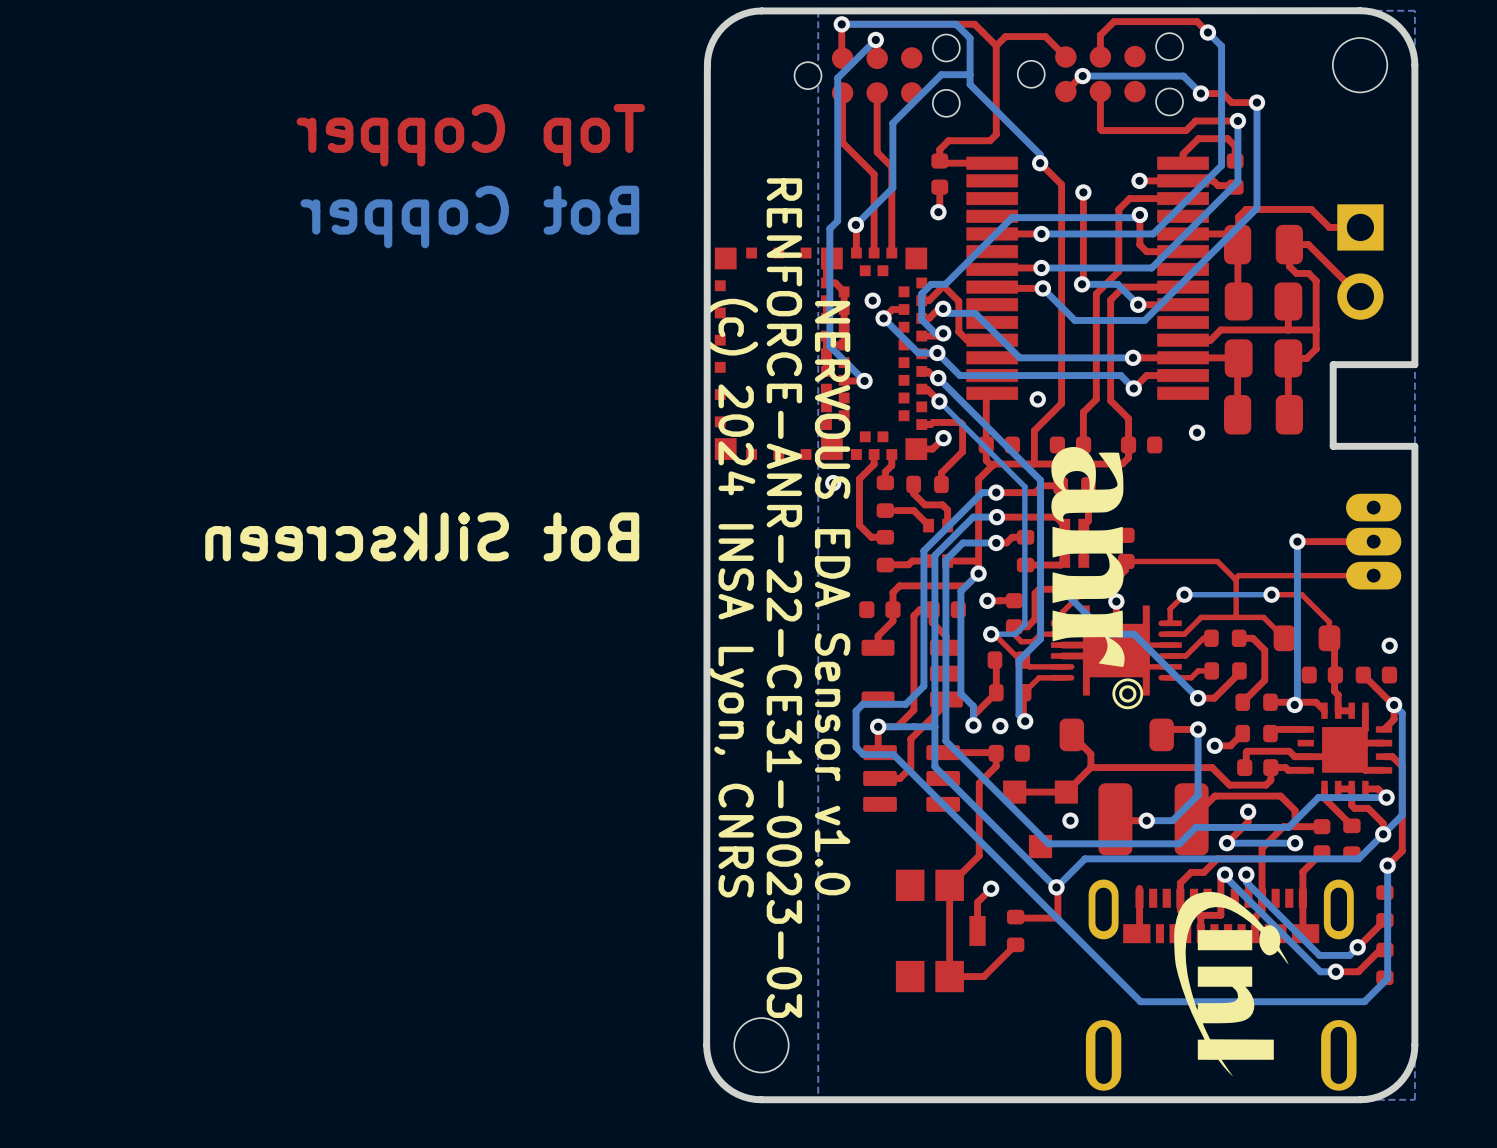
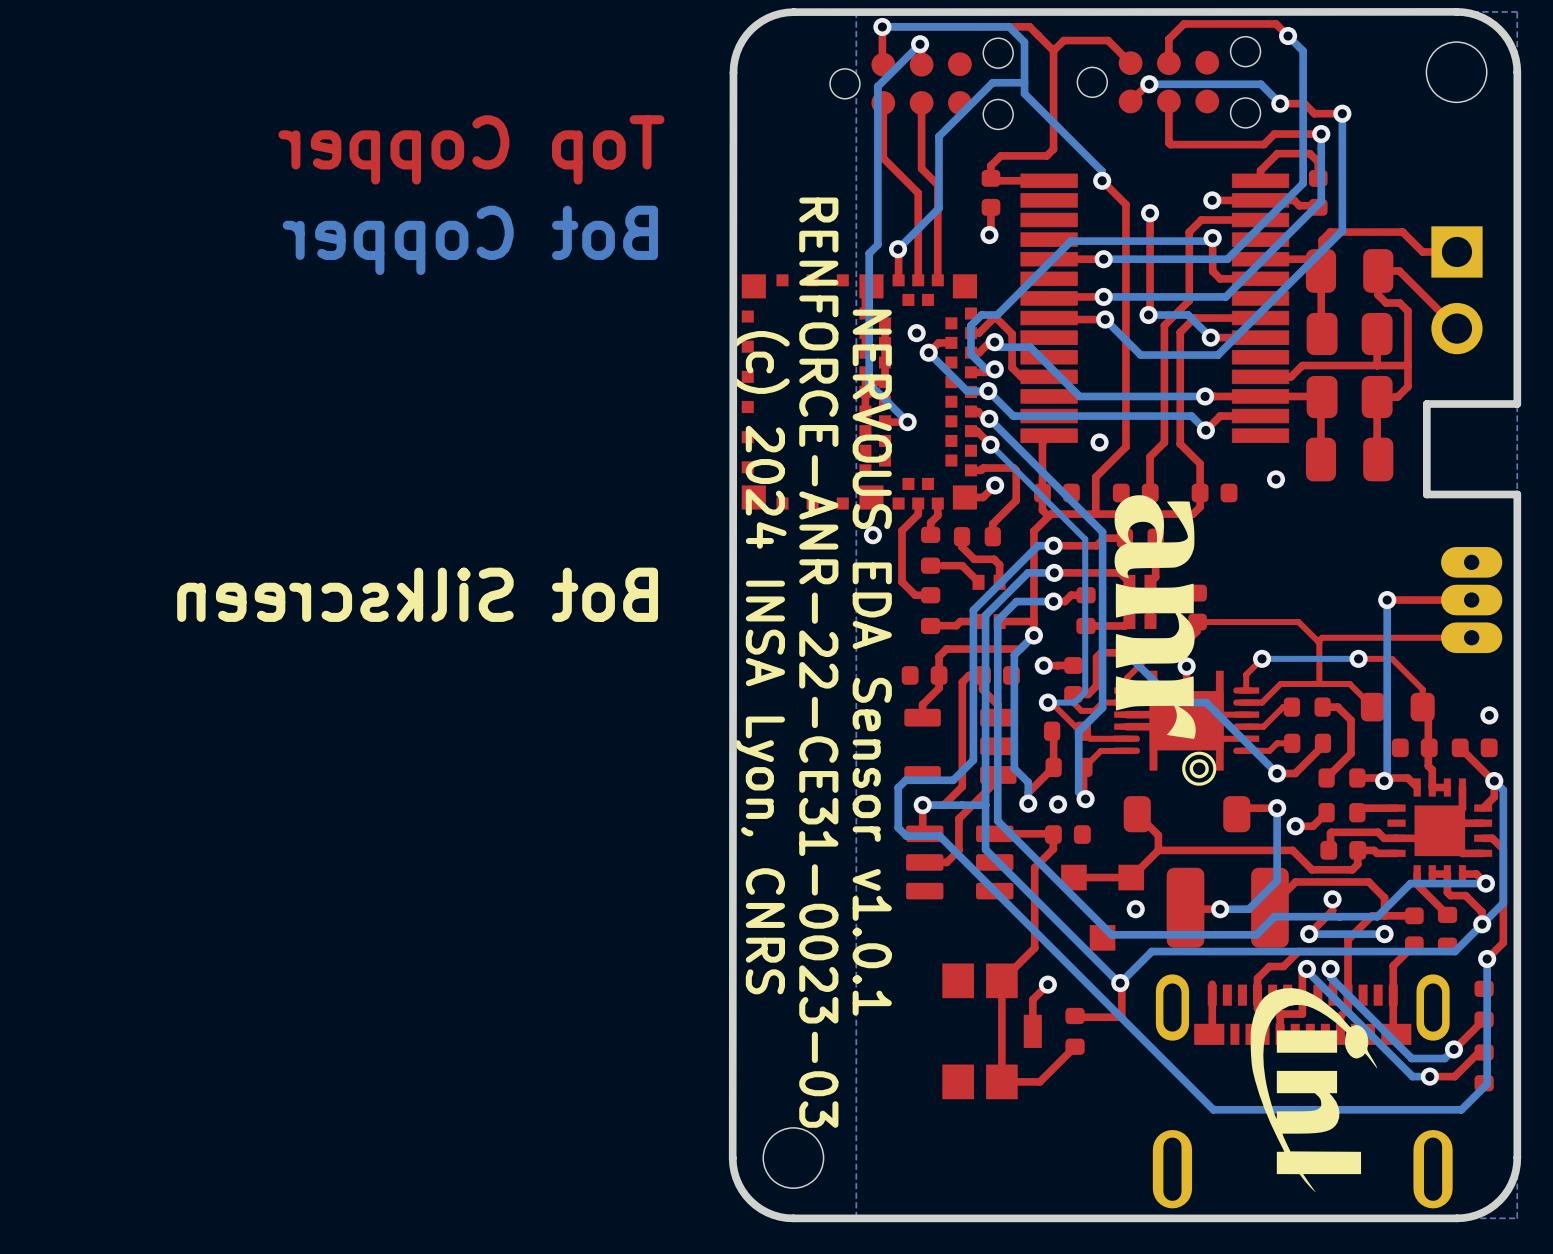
text: NERVOUS EDA Sensor v1.0 (832, 598) -> NERVOUS EDA Sensor v1.0.1 (872, 662)

